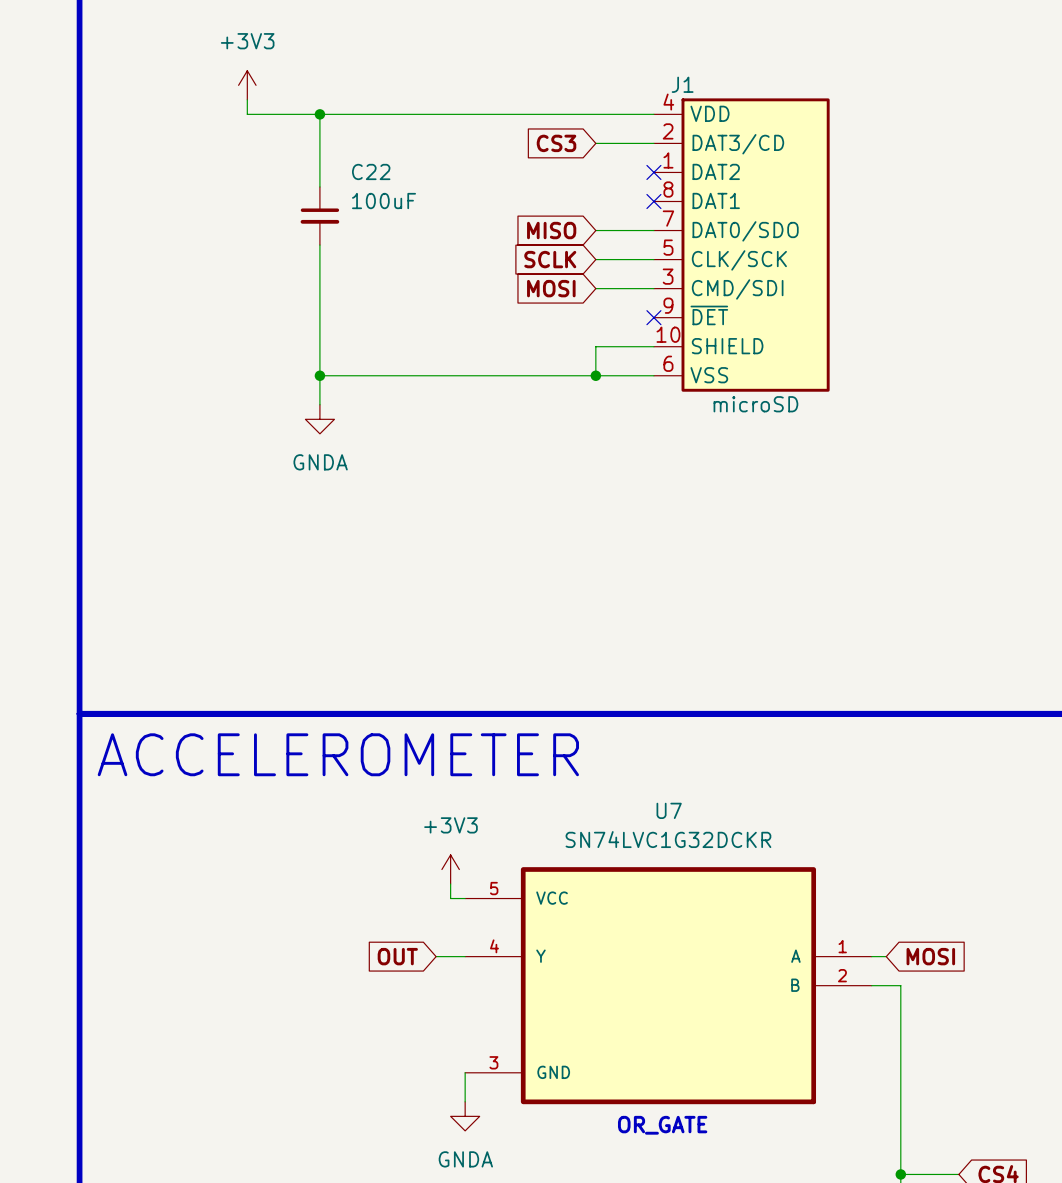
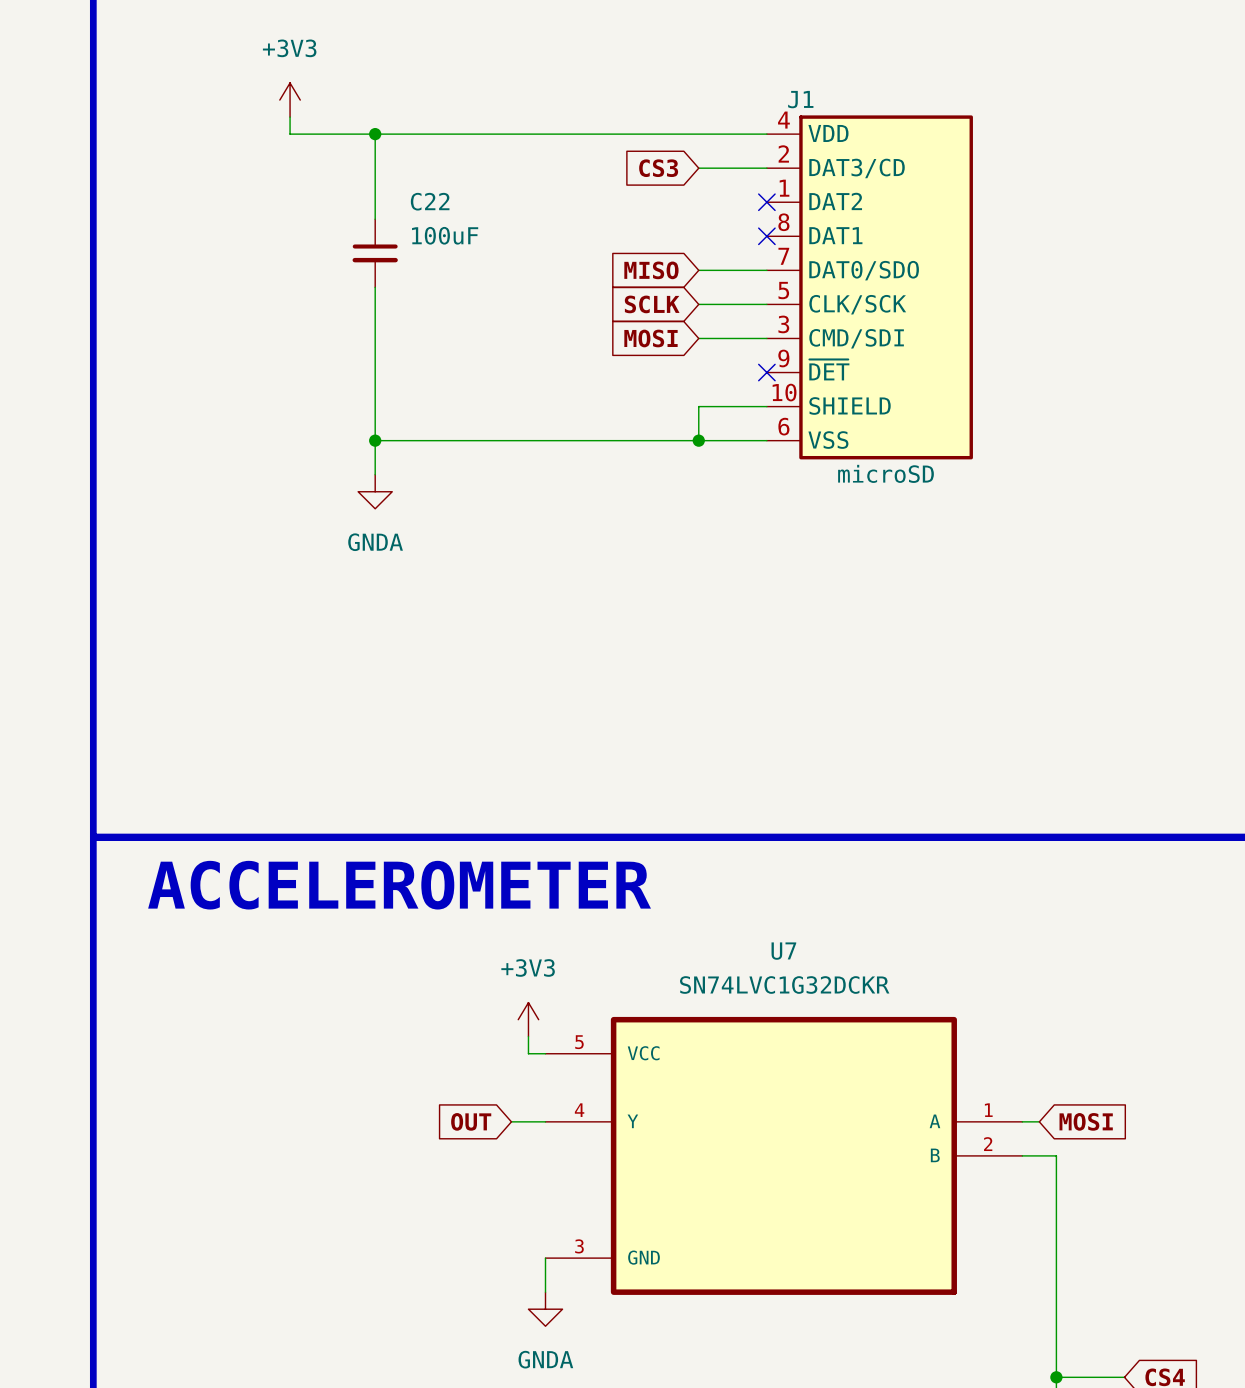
text: OR_GATE (662, 1125) -> none

